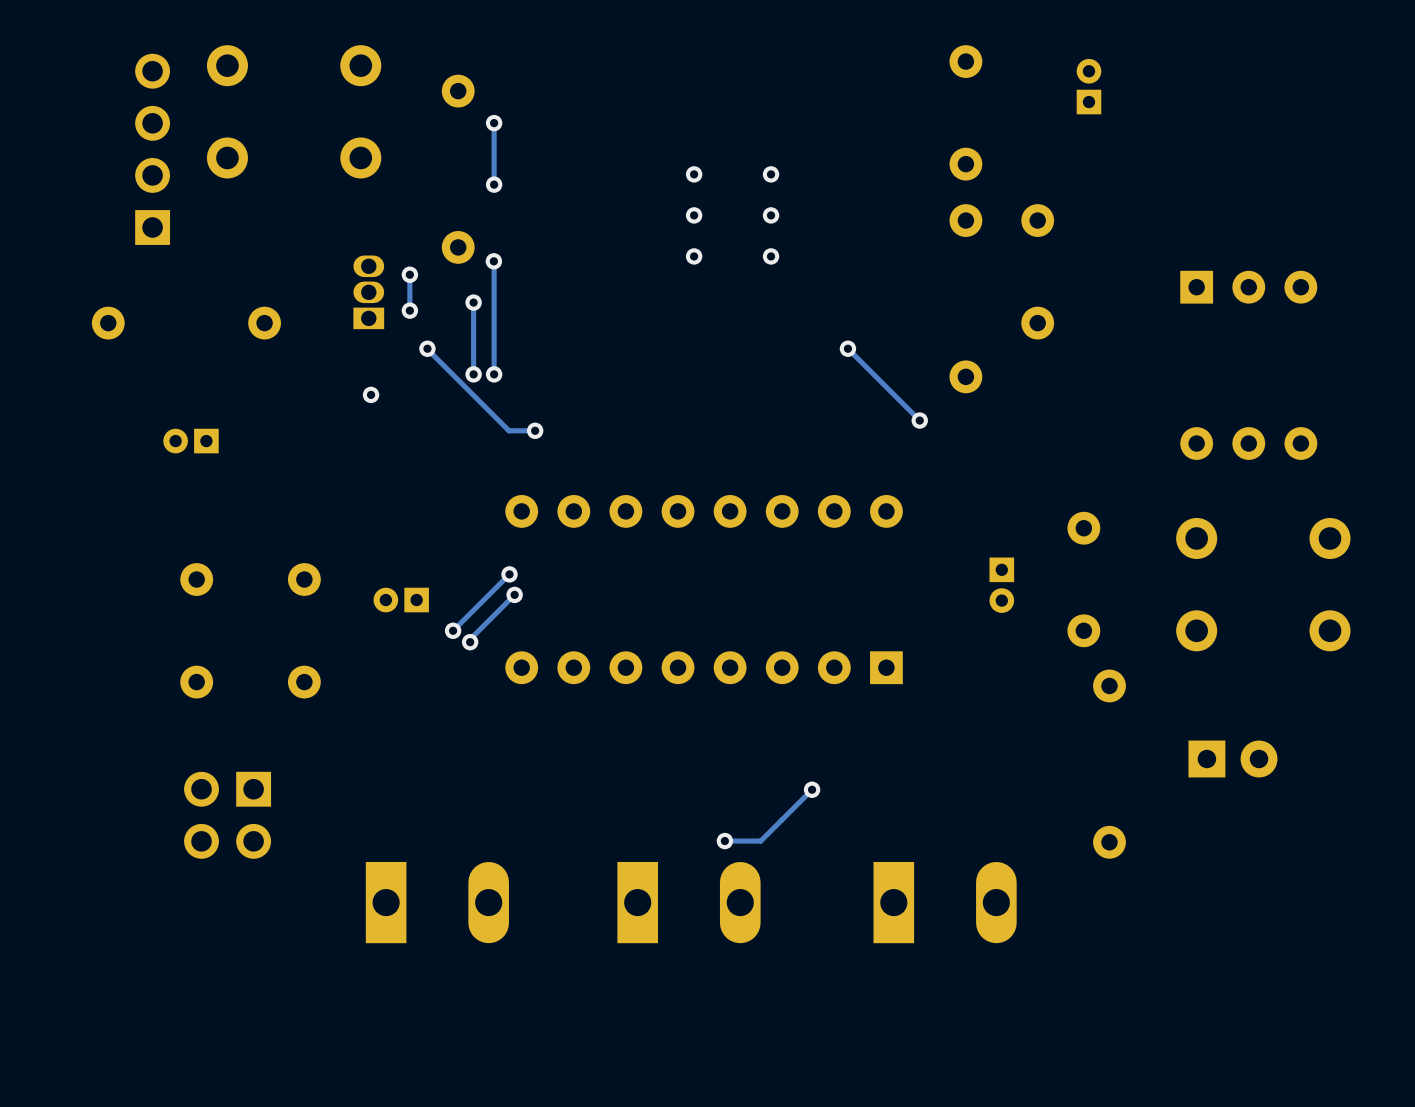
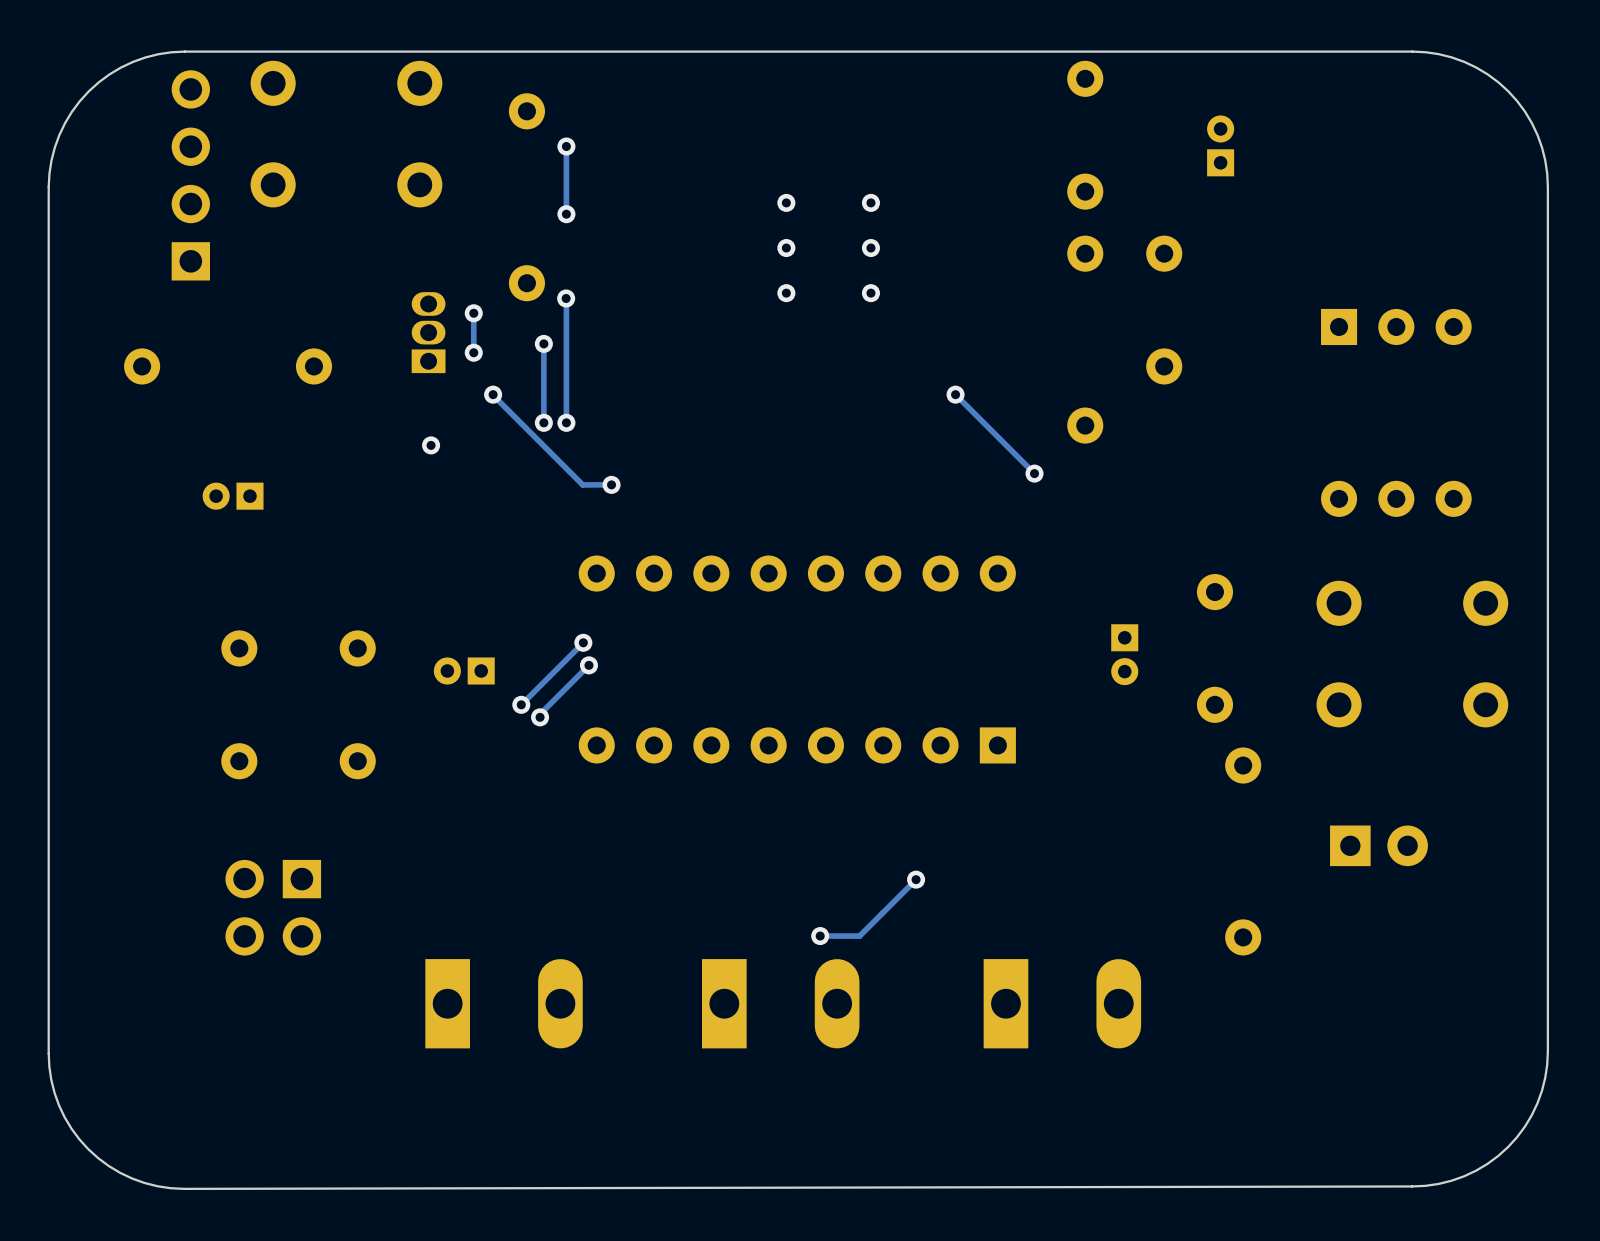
board edge: none -> (1412, 51) (185, 51) (145, 57) (121, 67) (98, 82) (79, 101) (65, 123) (54, 147) (48, 186) (48, 1053) (54, 1092) (64, 1117) (79, 1139) (108, 1166) (132, 1178) (157, 1186) (184, 1188) (1411, 1186) (1451, 1180) (1475, 1170) (1498, 1156) (1516, 1137) (1531, 1115) (1542, 1090) (1547, 1064) (1547, 173) (1542, 147) (1531, 123) (1508, 91) (1487, 74) (1464, 61) (1438, 54) (1412, 51)
part position: (1088, 86) -> (1220, 145)

